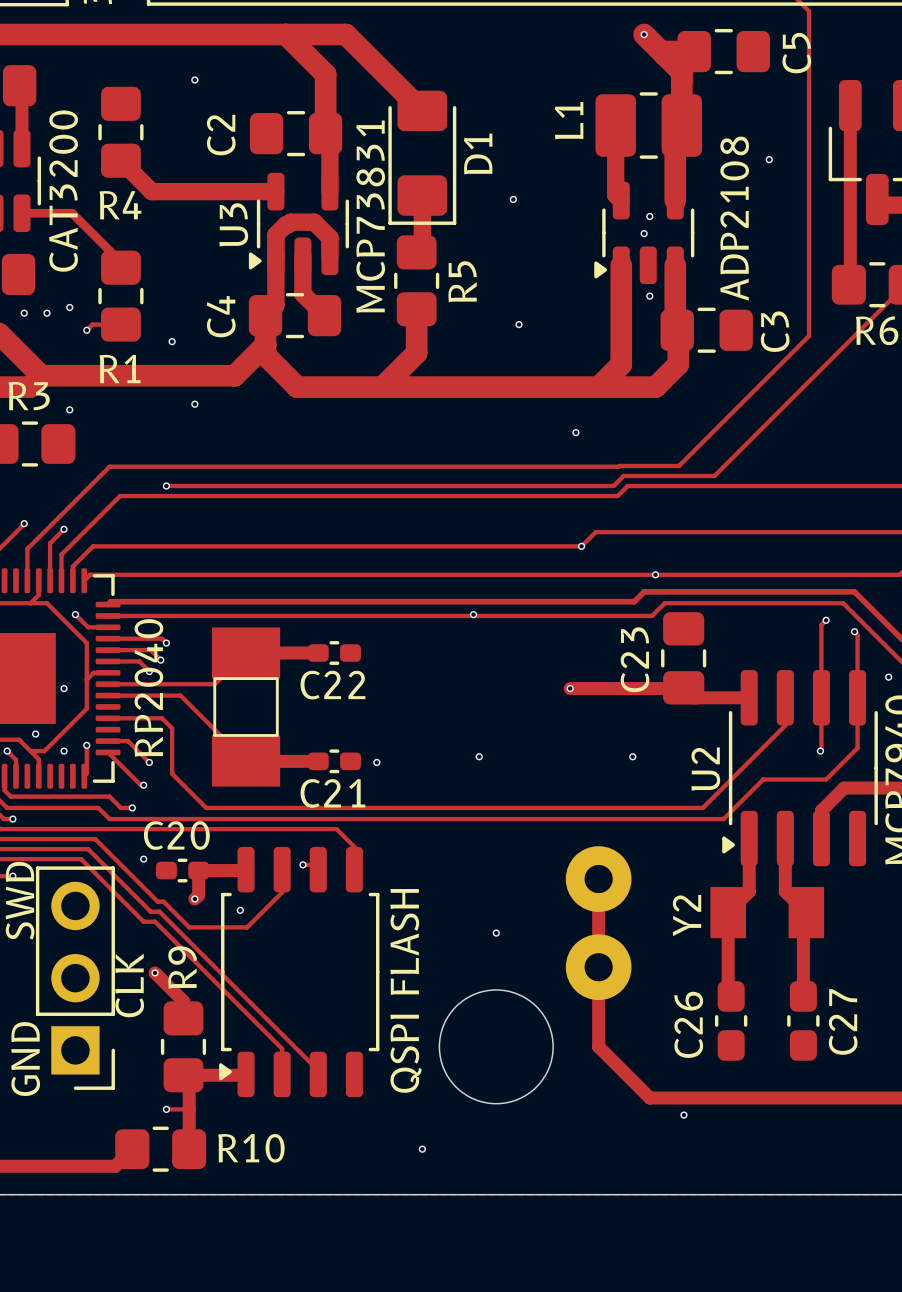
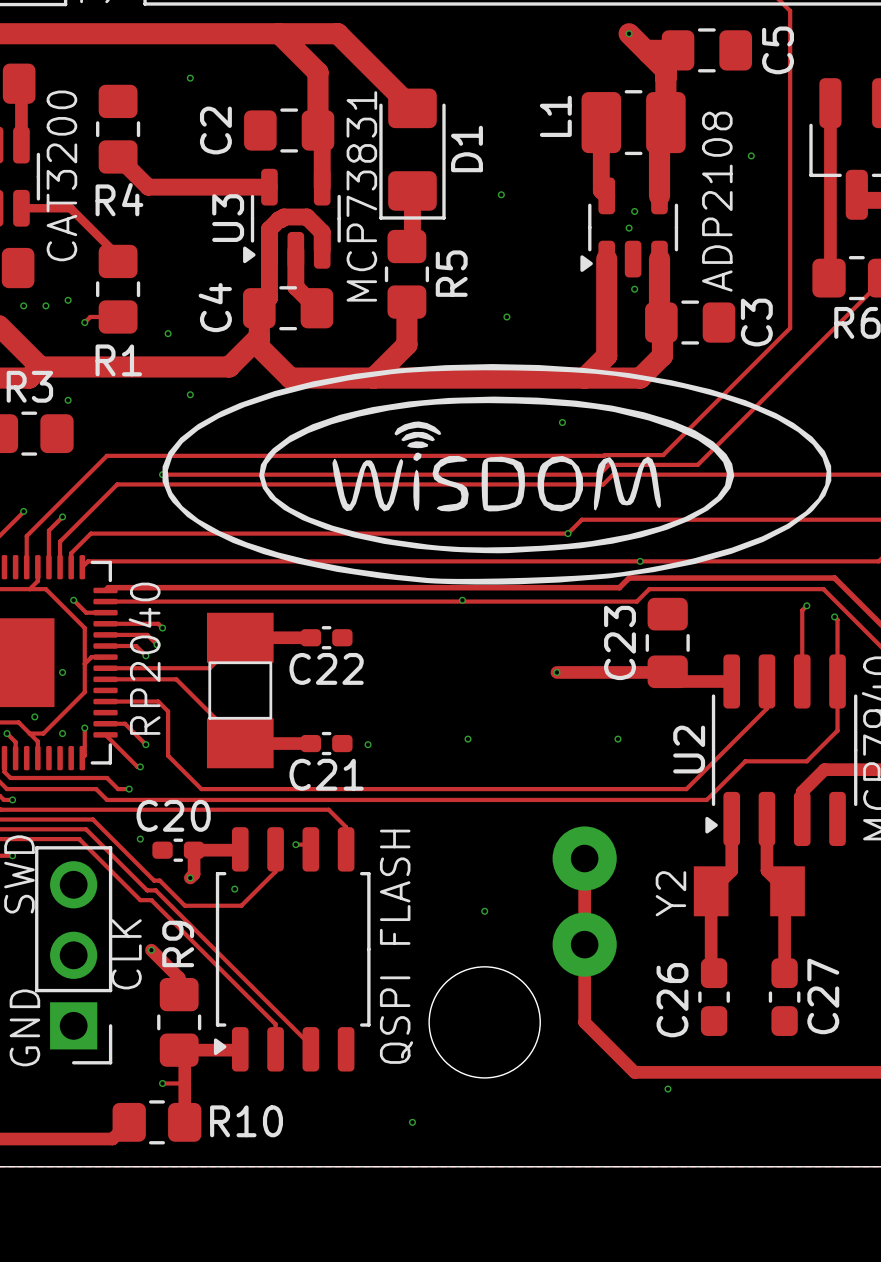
drawing: none -> [162, 364, 832, 585]
via: (888, 677) -> none
track: (821, 697) (820, 751) -> none
via: (820, 751) -> none

